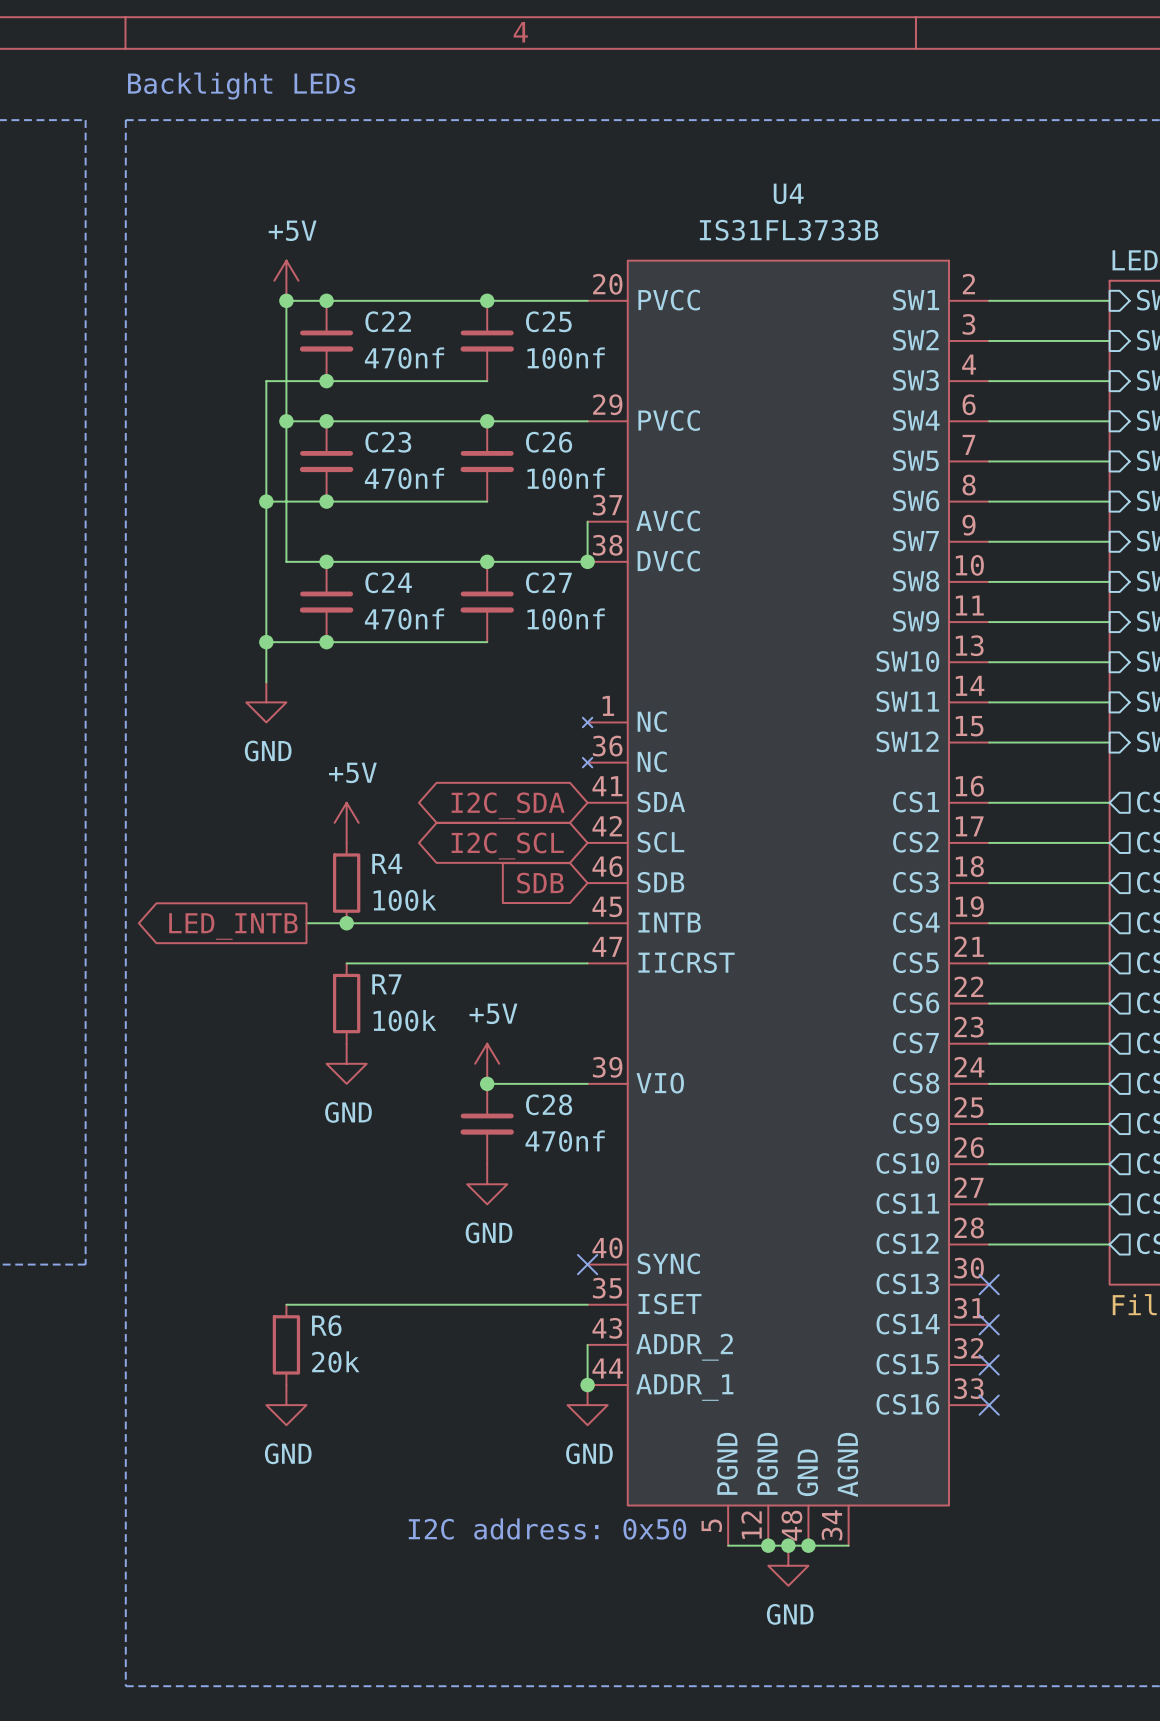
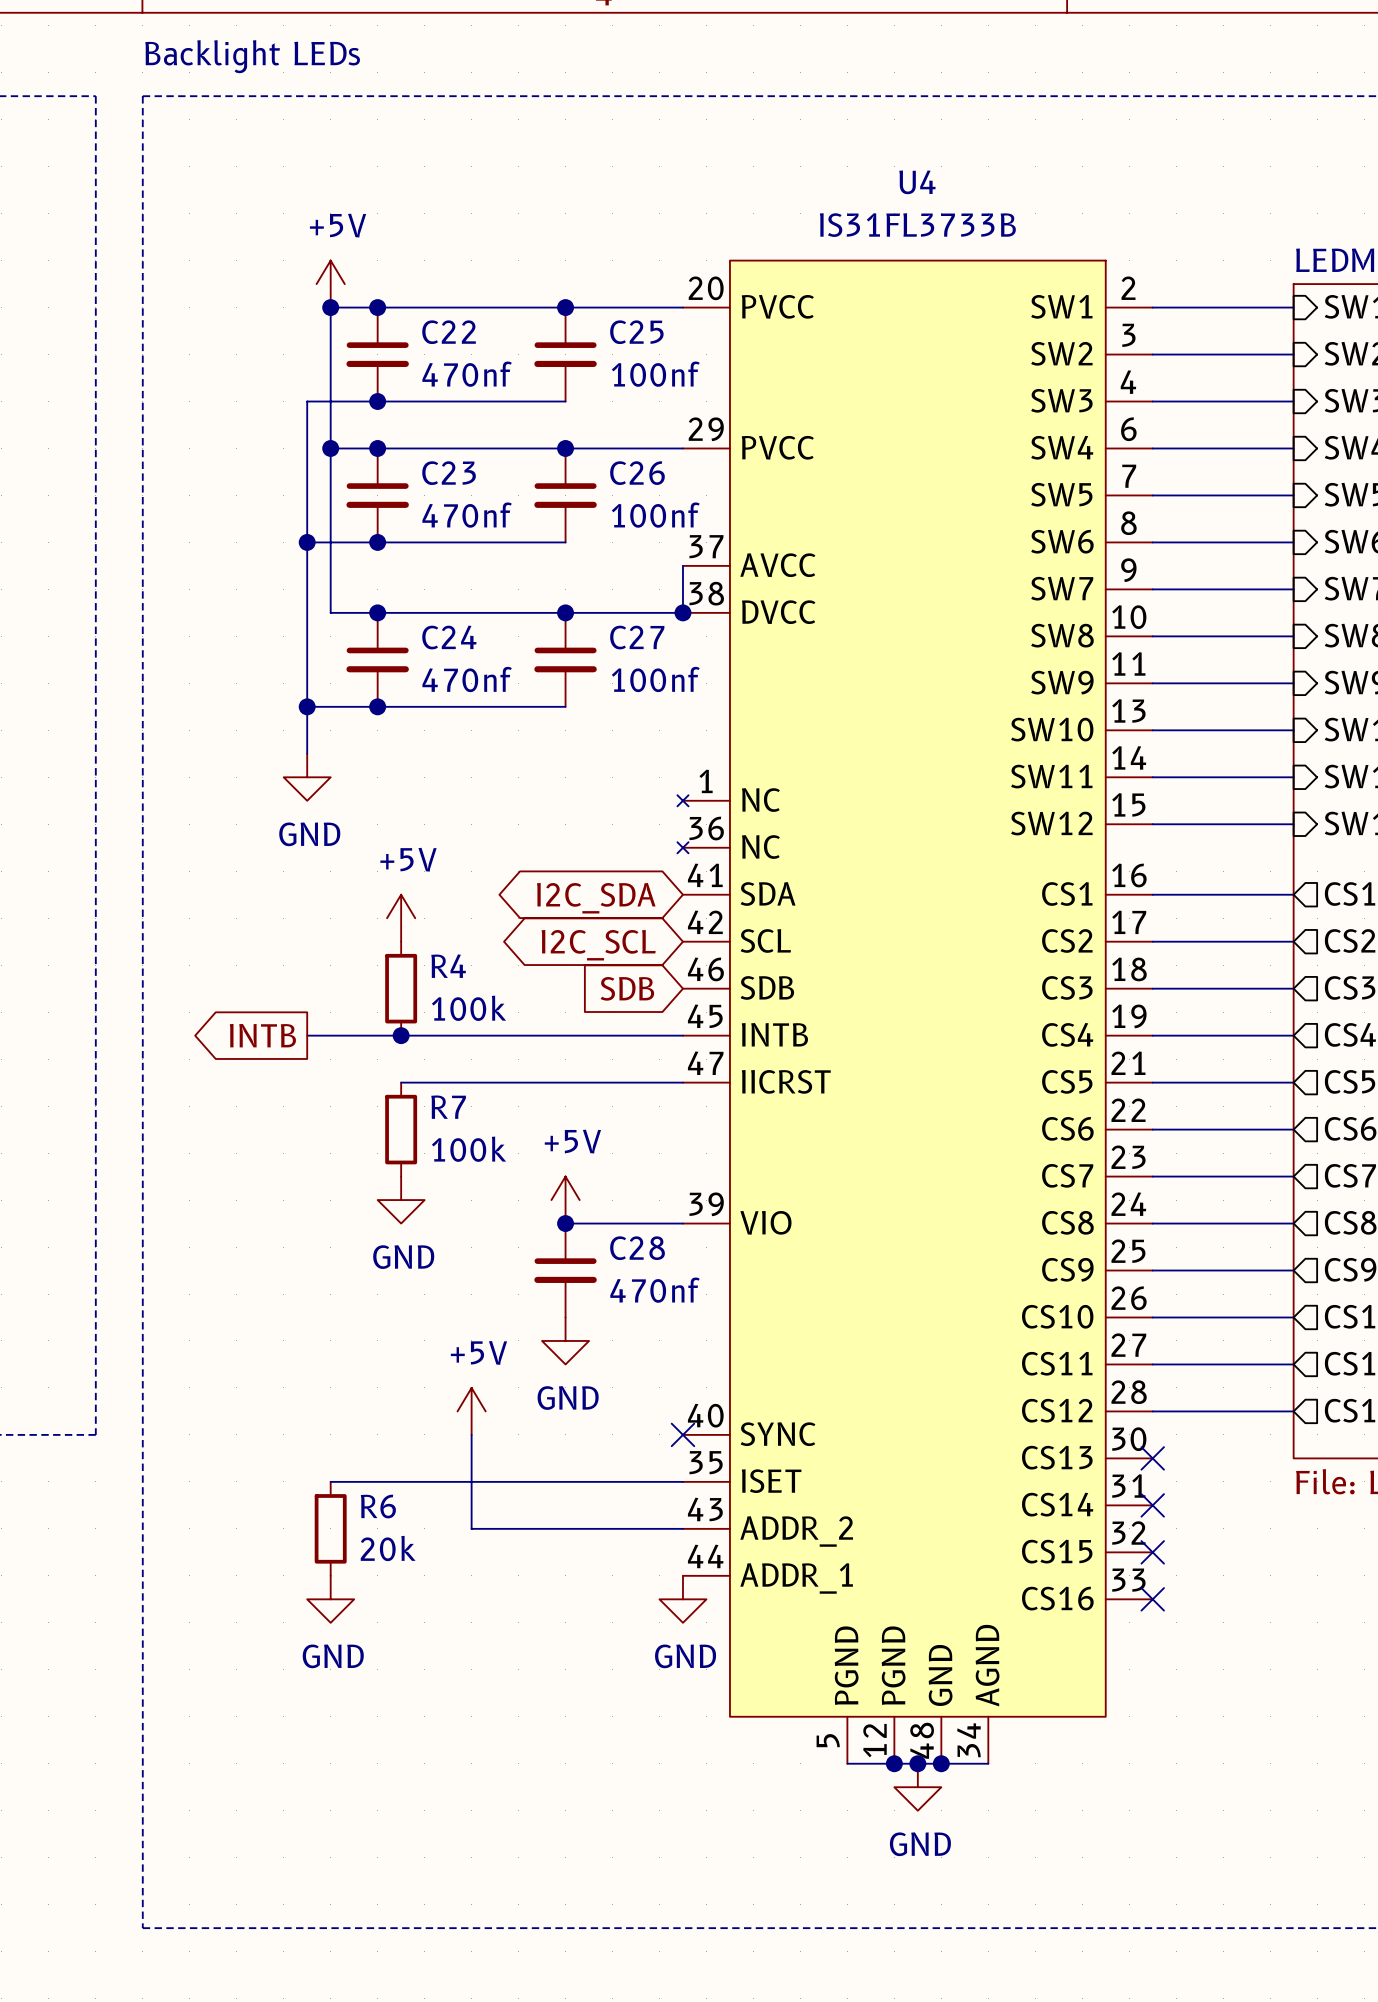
wire: none -> (307, 1035) (354, 1035)
global label: LED_INTB (233, 926) -> INTB (262, 1035)
power symbol: none -> +5V (471, 1411)
wire: (587, 1344) (587, 1385) -> (682, 1528) (471, 1528) (471, 1434)
junction: (587, 1385) -> none
text: I2C address: 0x50 (547, 1528) -> none

